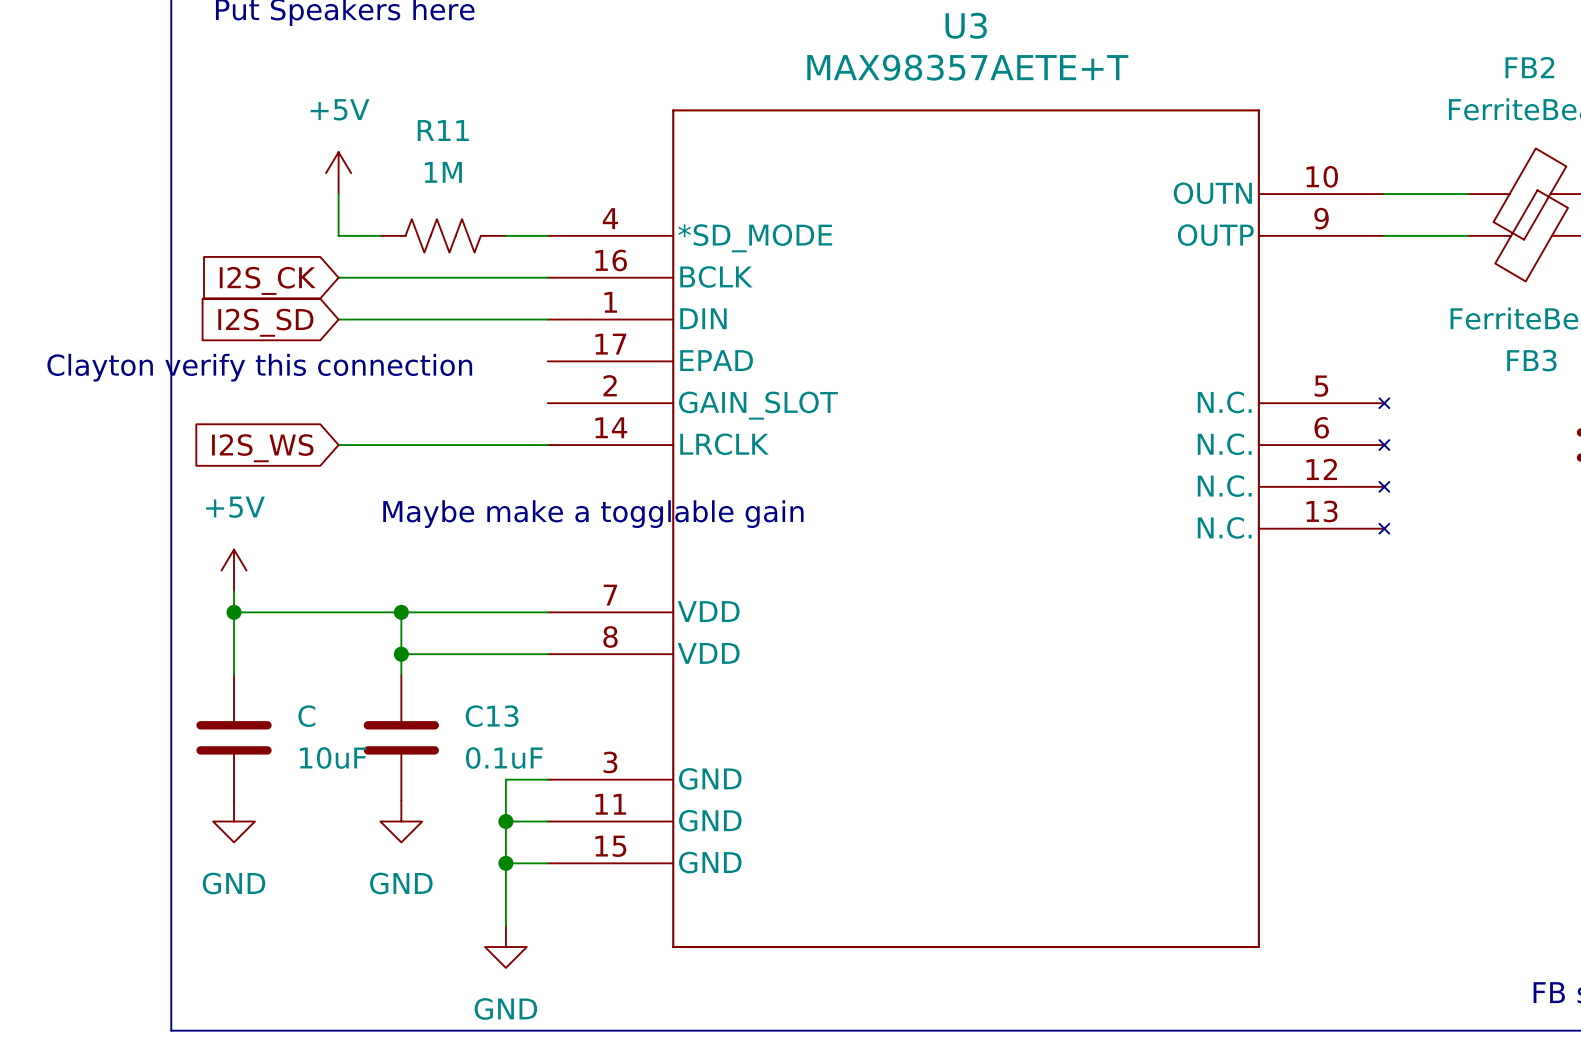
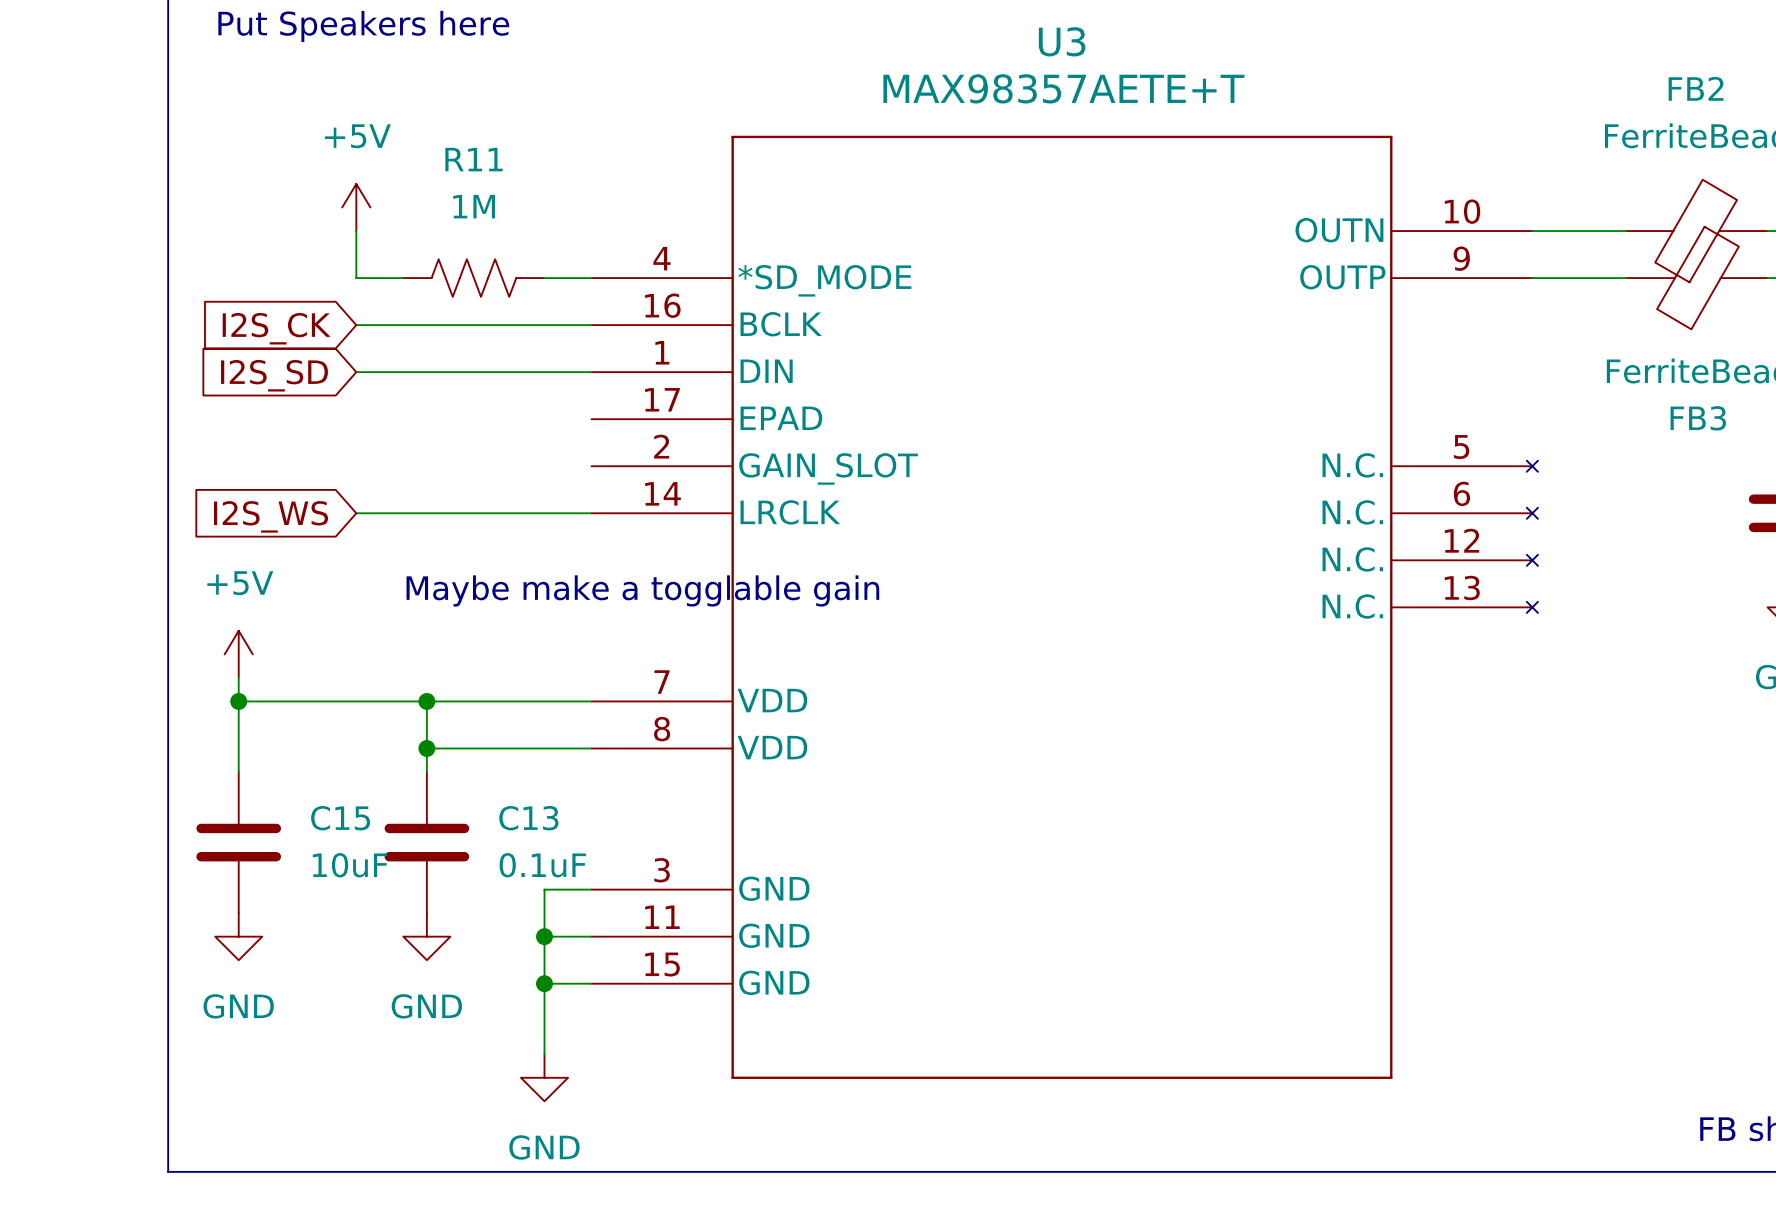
text: Clayton verify this connection (259, 367) -> none
C name: C (306, 716) -> C15 (340, 818)

